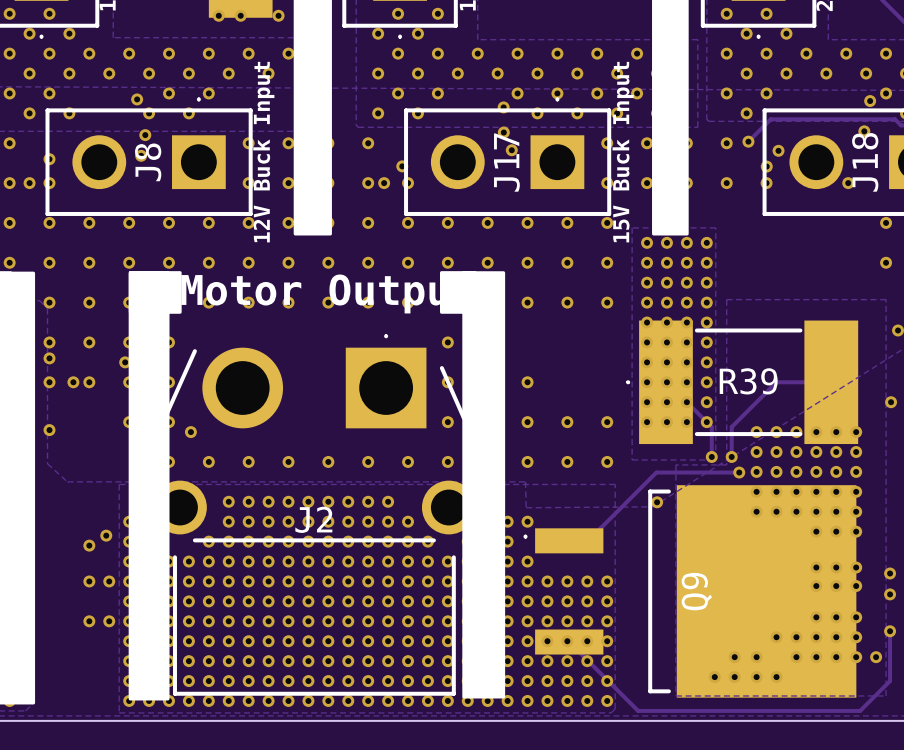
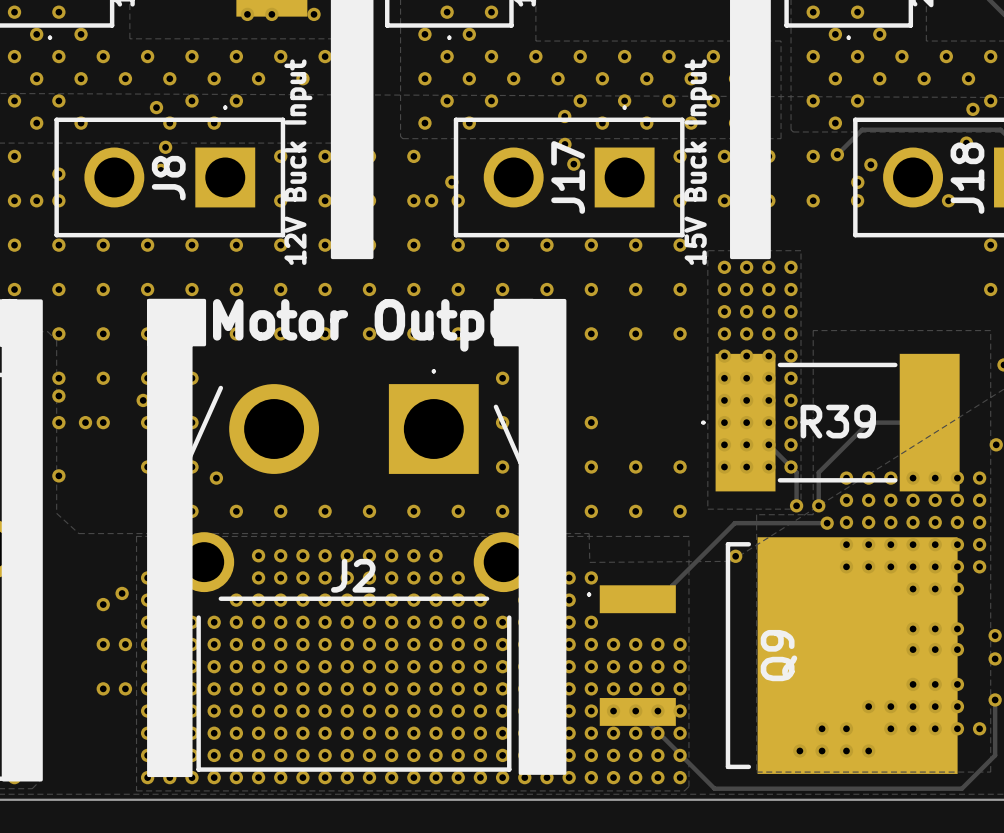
via: none -> (979, 478)
via: none -> (979, 500)
via: none -> (979, 522)
via: none -> (979, 544)
via: none -> (979, 566)

